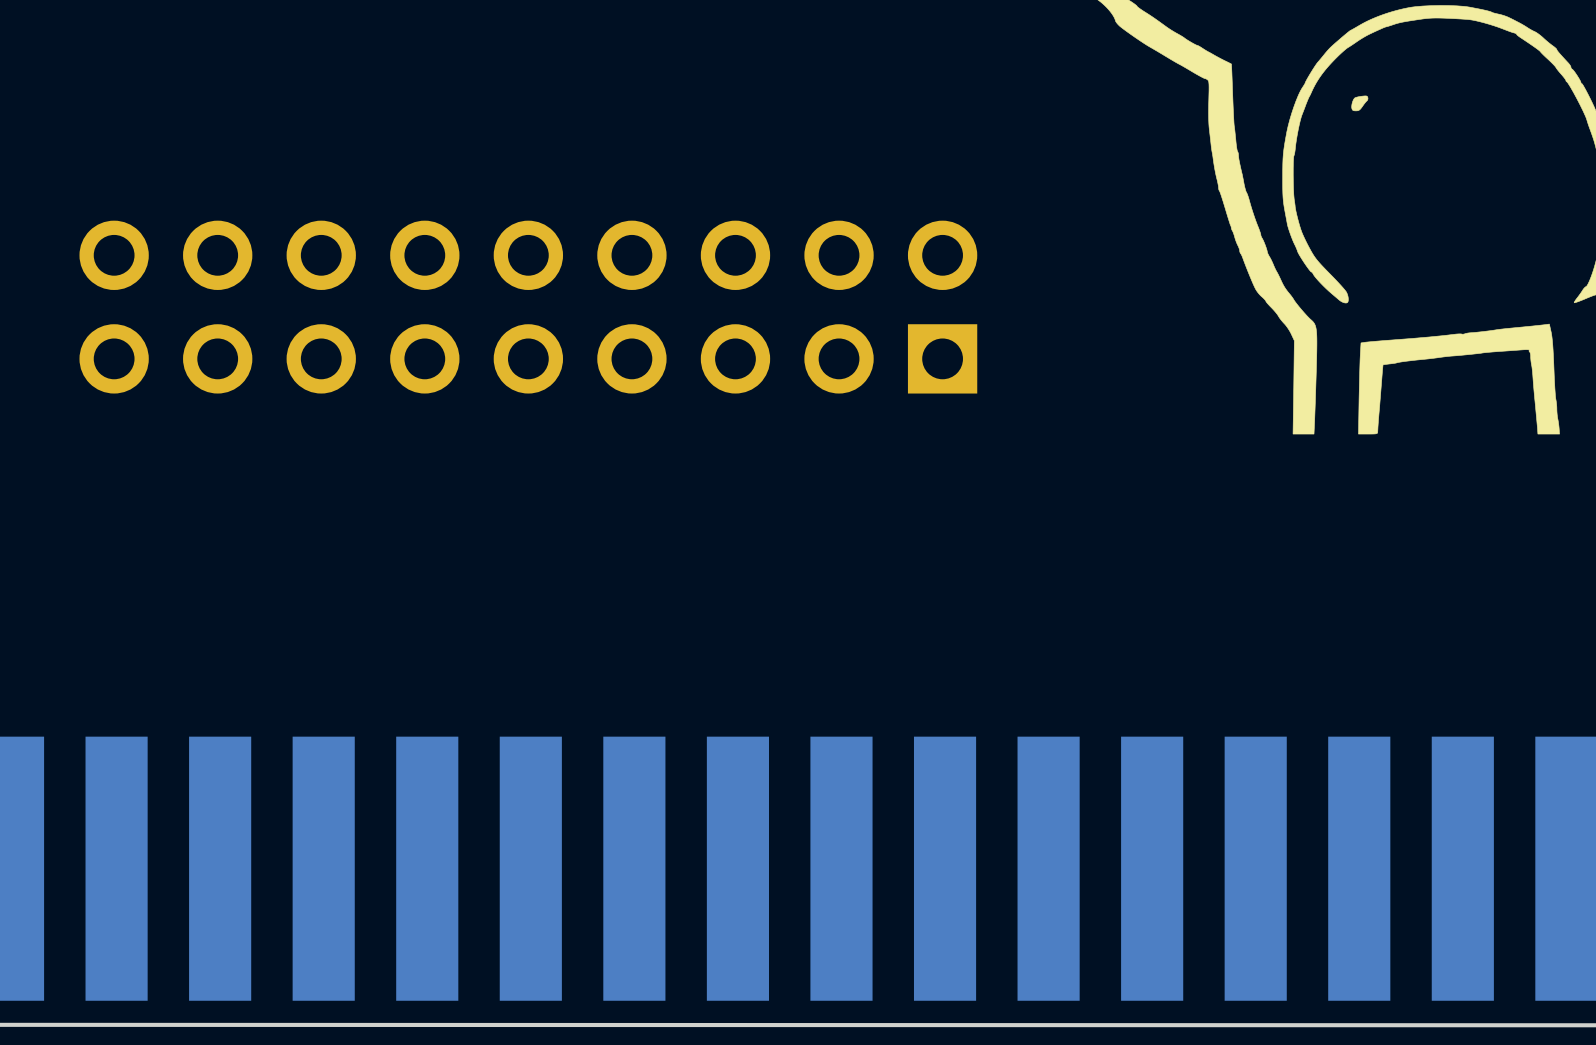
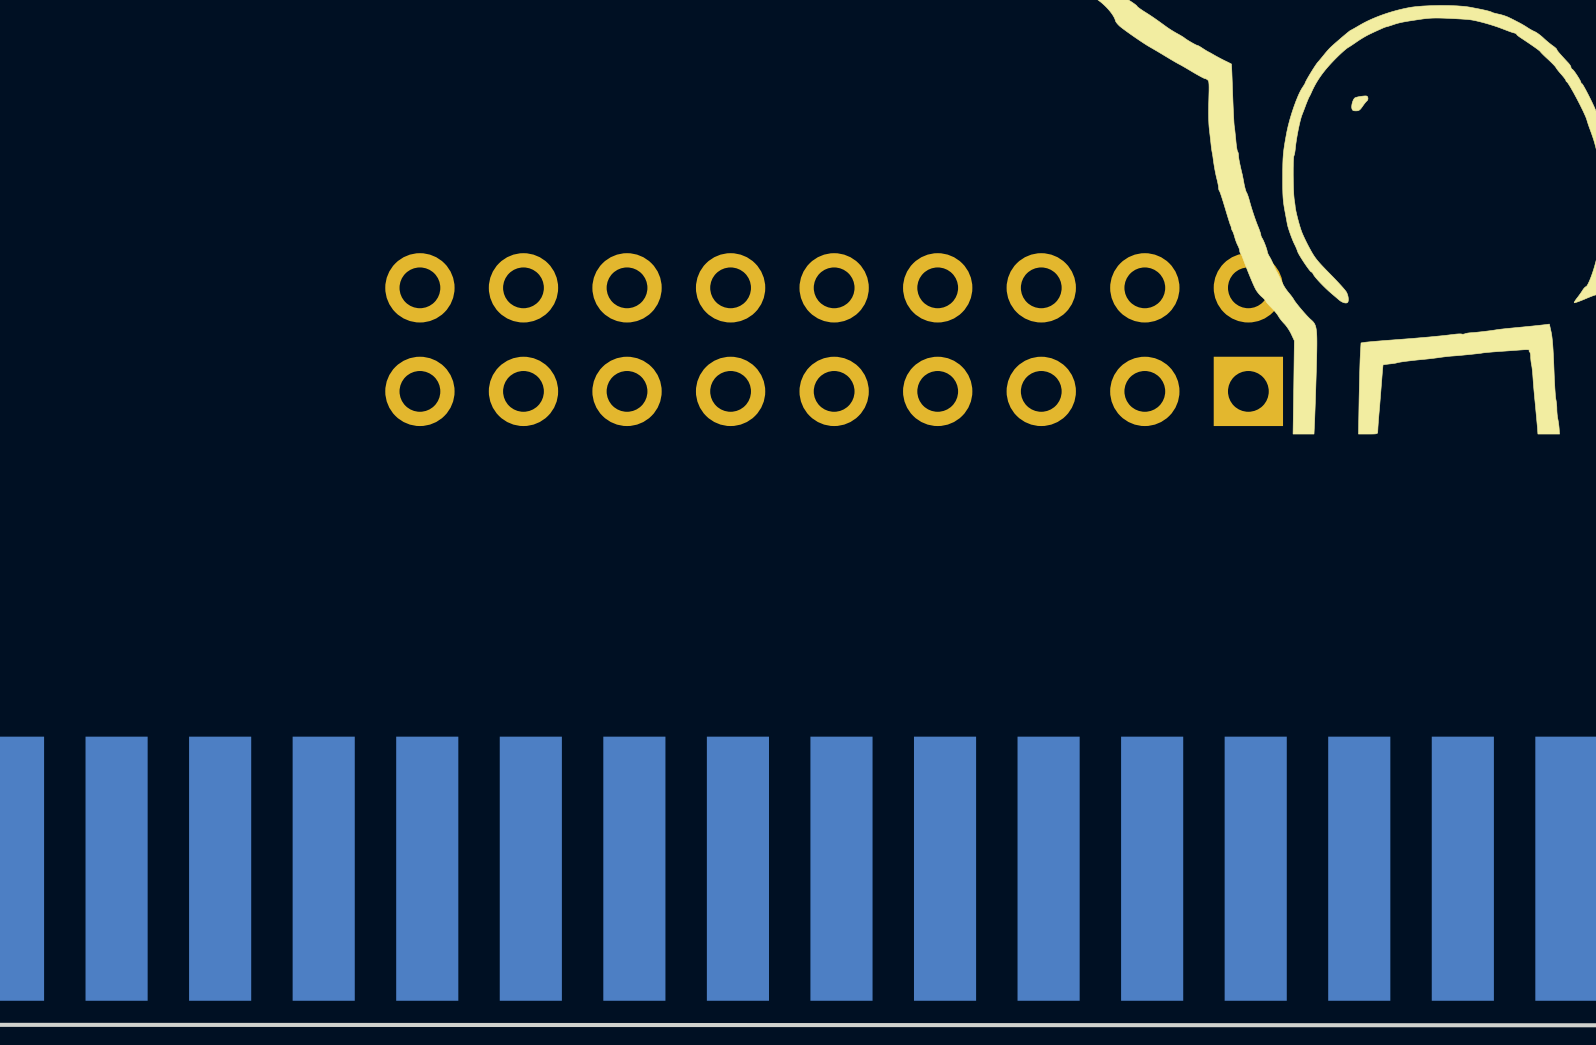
part position: (528, 307) -> (834, 339)

